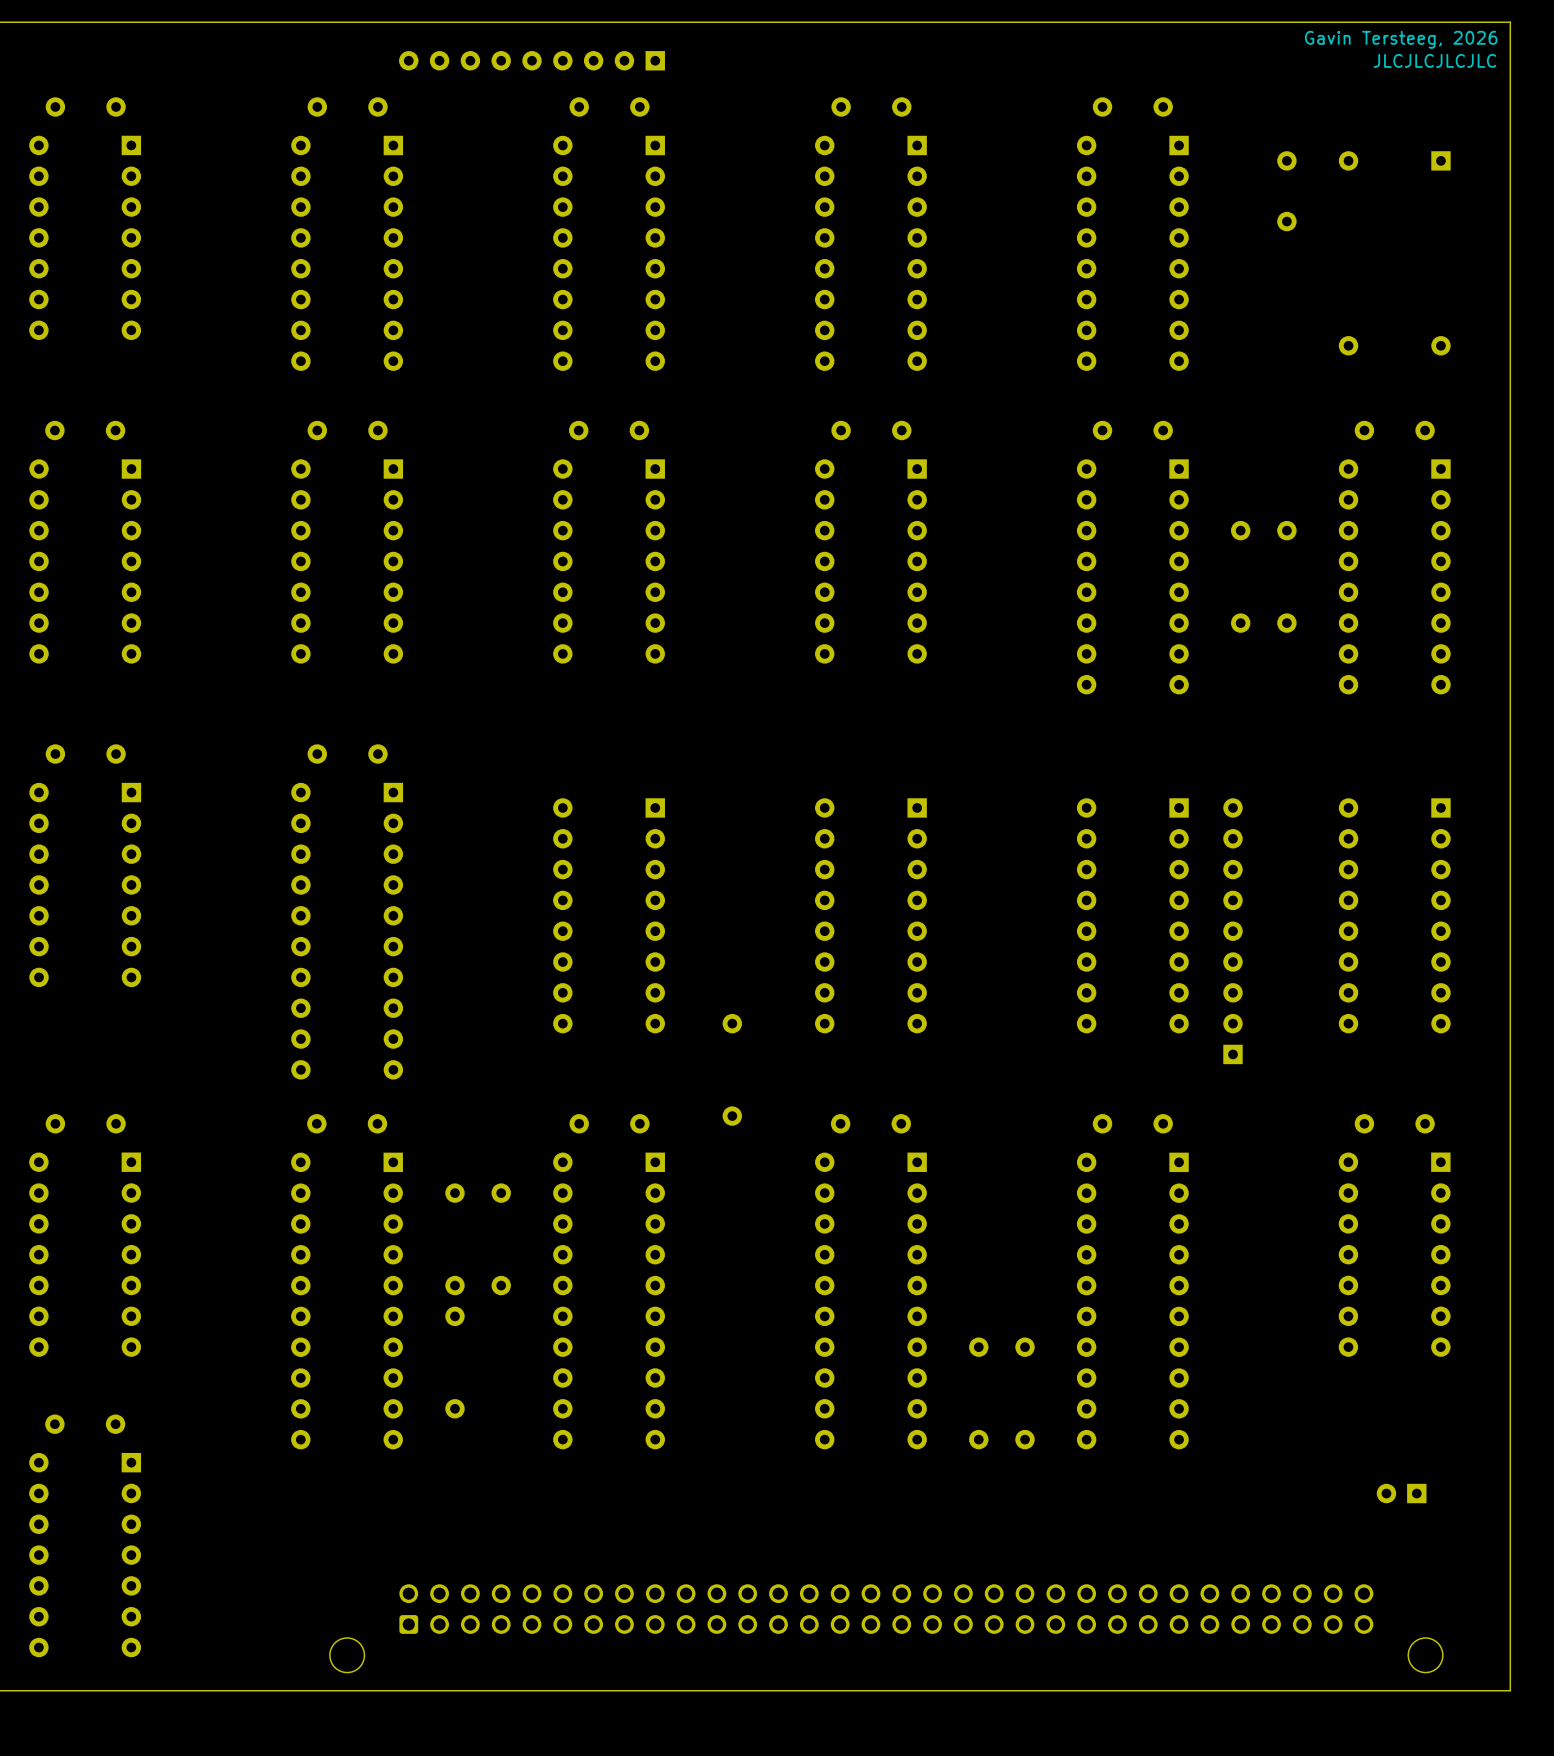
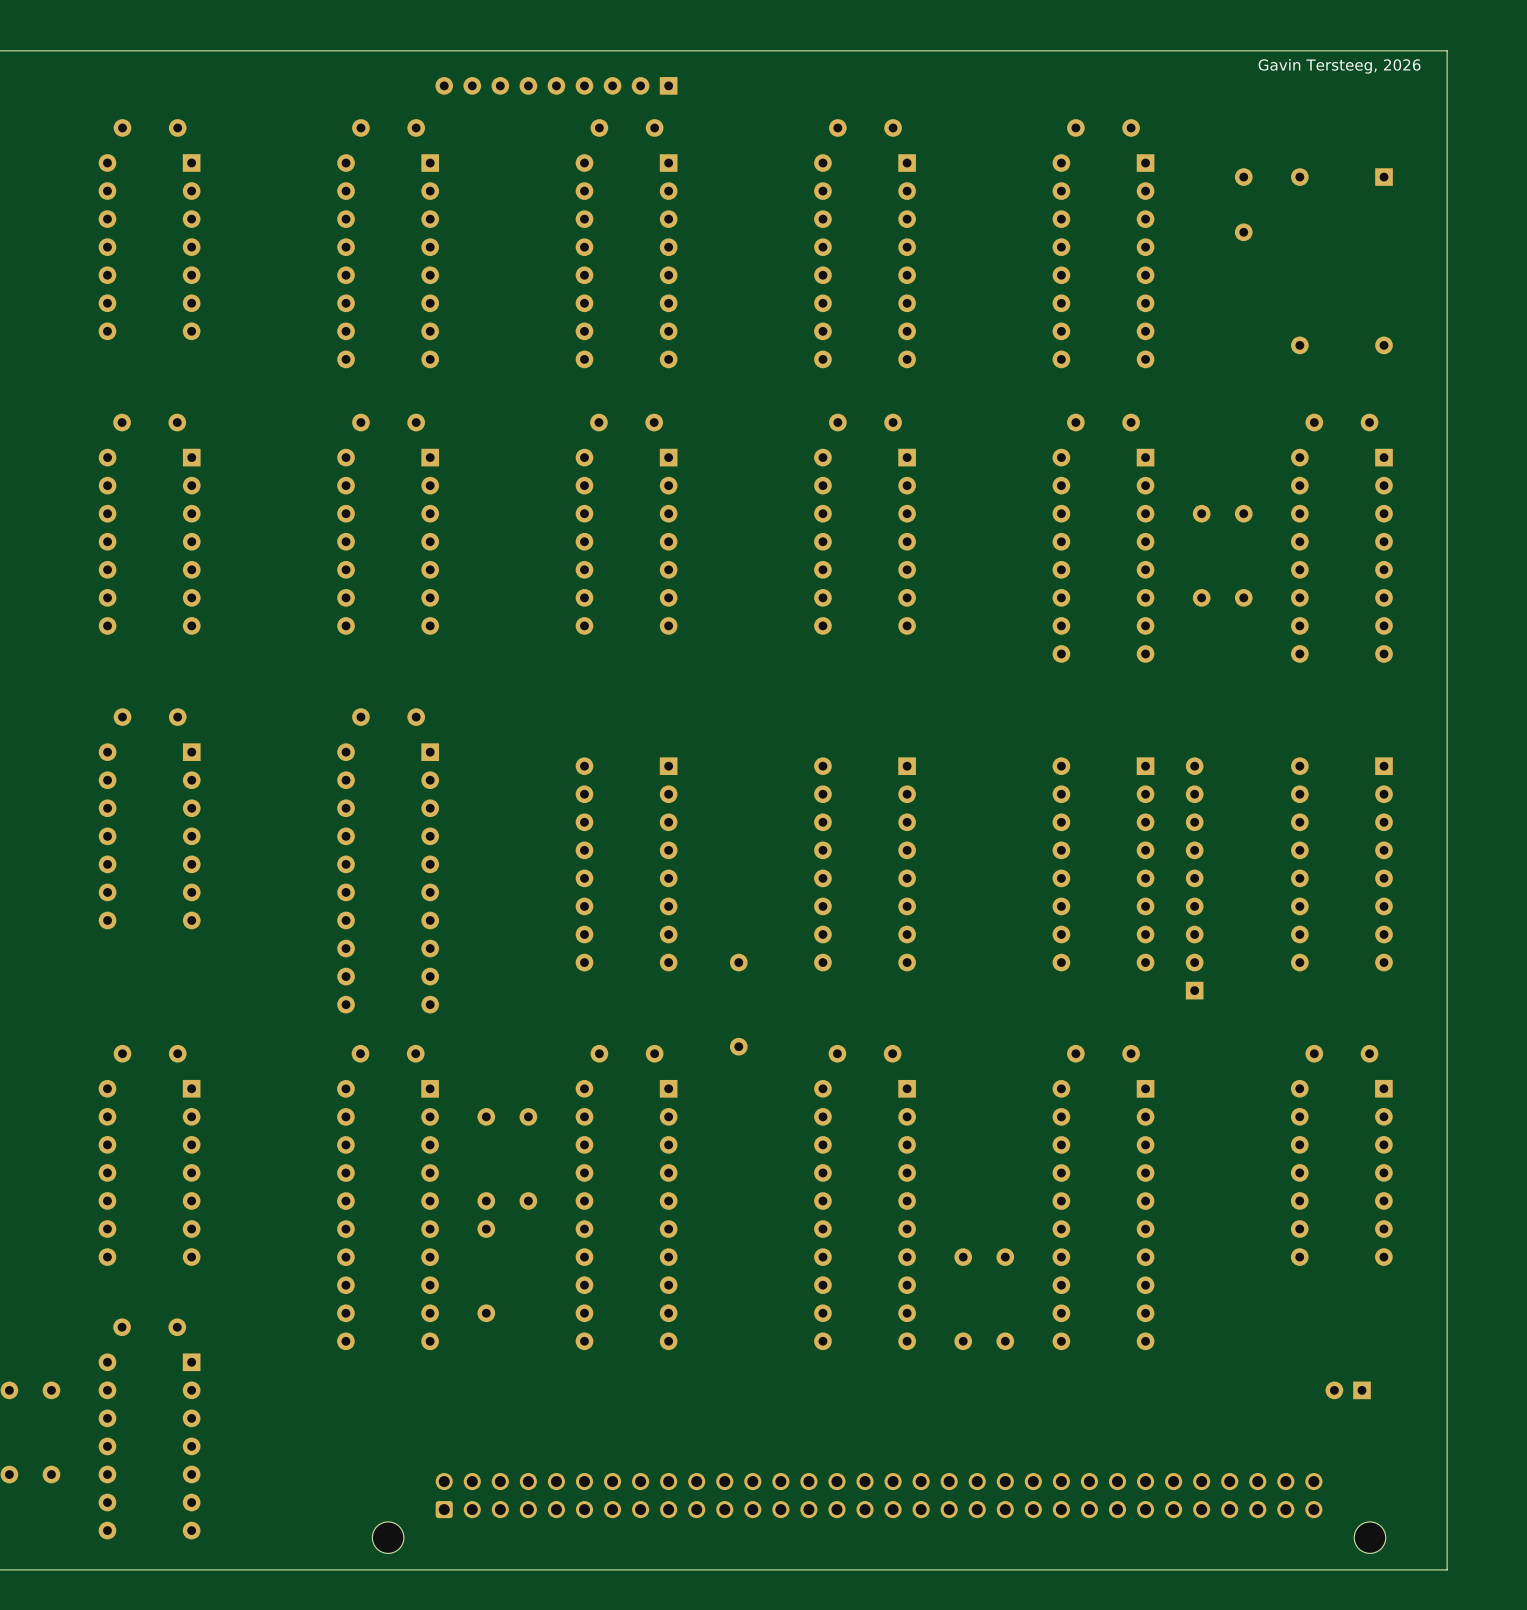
text: JLCJLCJLCJLC (1434, 60) -> none

